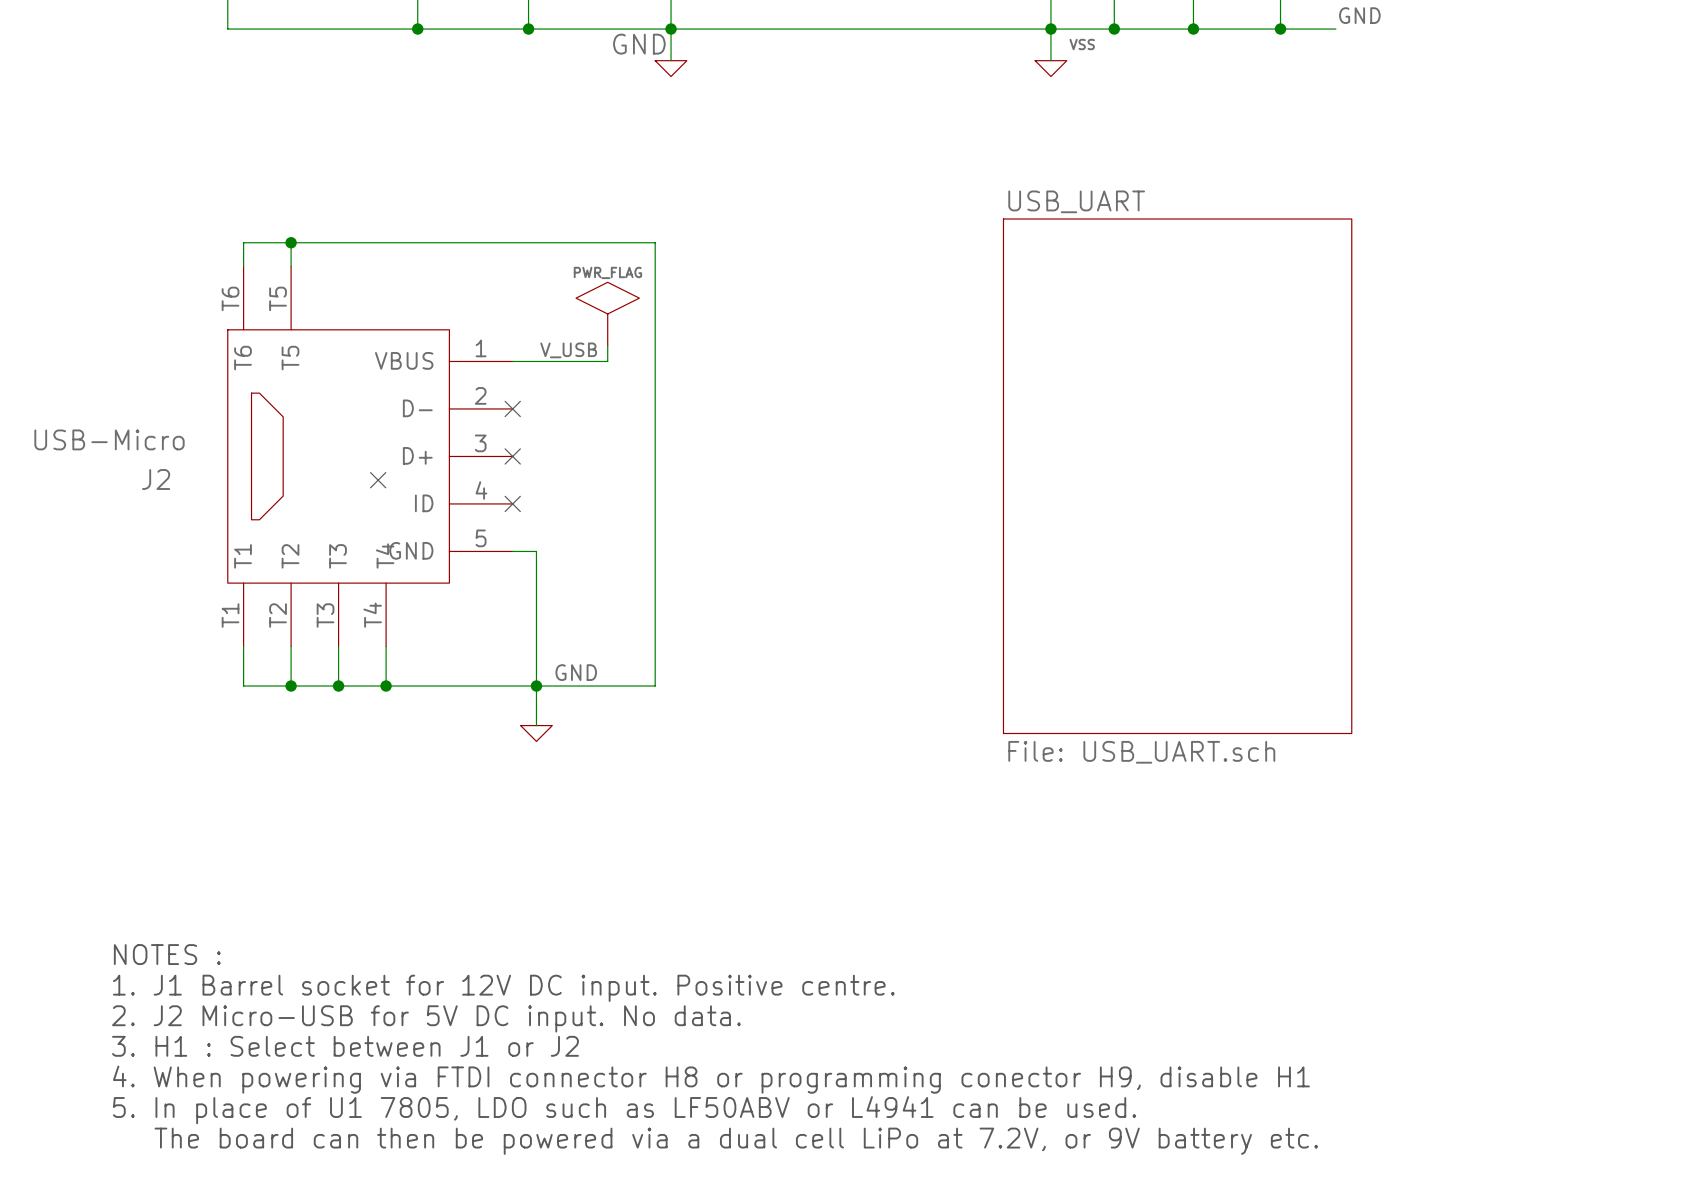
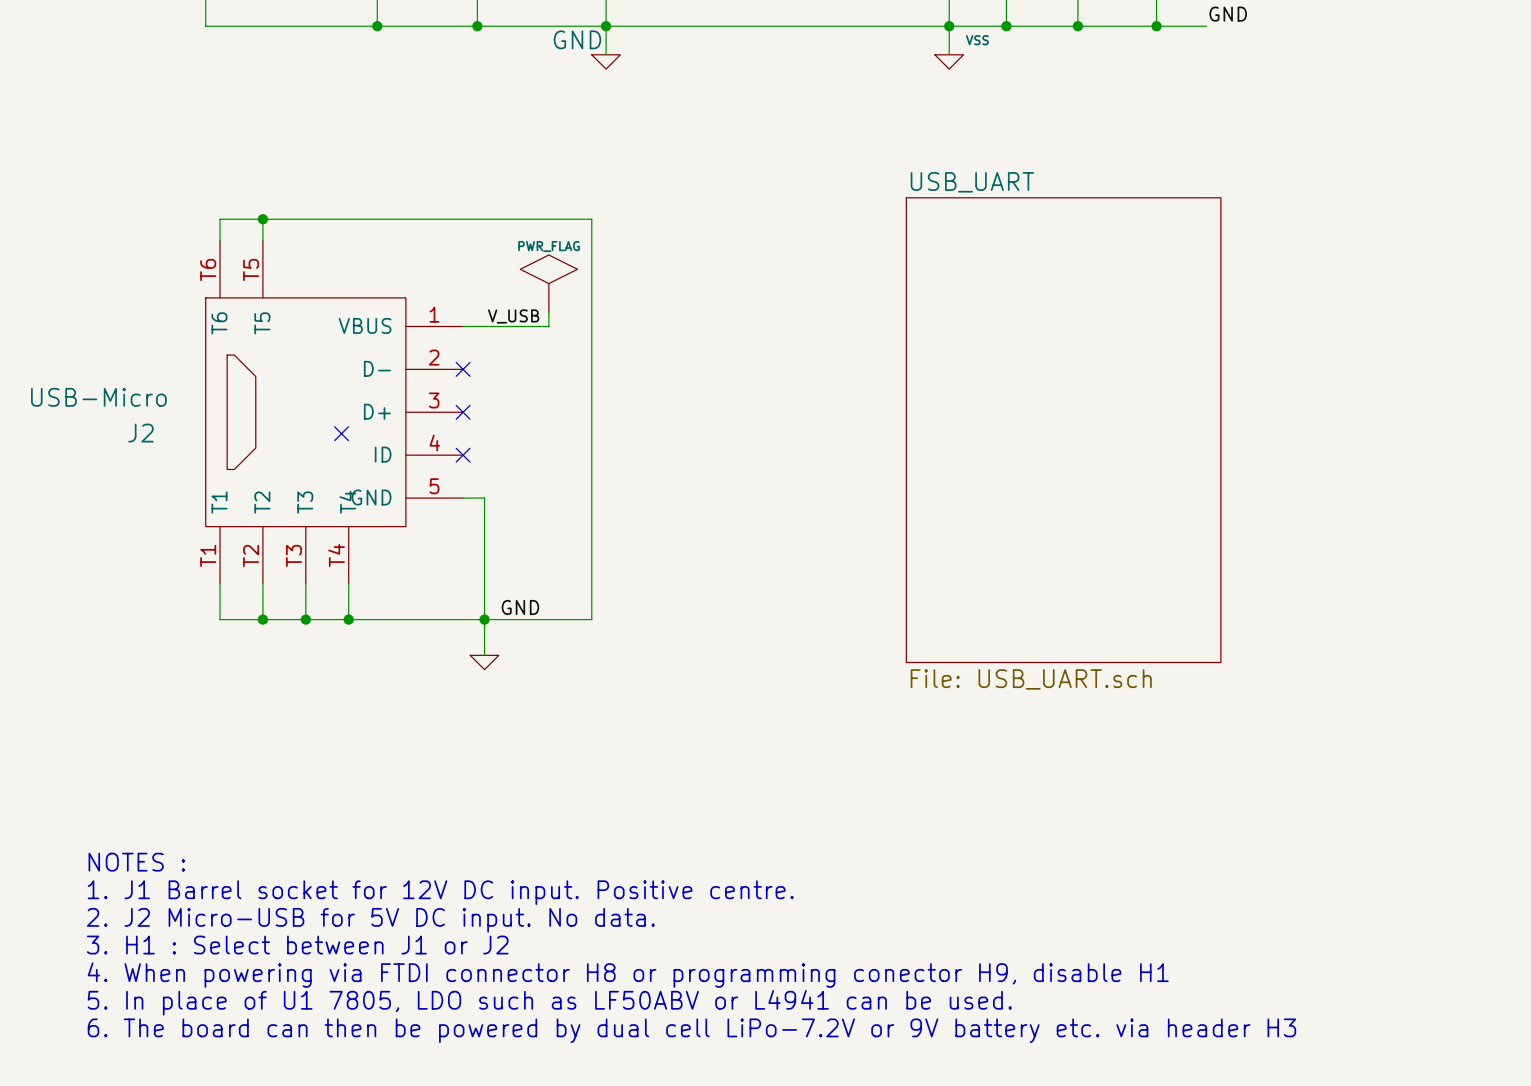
text position: NOTES : (167, 954) -> NOTES : (136, 862)
text position: 1. J1 Barrel socket for 12V DC input. Positive centre. (503, 988) -> 1. J1 Barrel socket for 12V DC input. Positive centre. (440, 892)
text position: 2. J2 Micro-USB for 5V DC input. No data. (426, 1018) -> 2. J2 Micro-USB for 5V DC input. No data. (370, 920)
text position: 3. H1 : Select between J1 or J2 (345, 1046) -> 3. H1 : Select between J1 or J2 (297, 945)
text position: 4. When powering via FTDI connector H8 or programming conector H9, disable H1 (711, 1079) -> 4. When powering via FTDI connector H8 or programming conector H9, disable H1 (628, 975)
text position: 5. In place of U1 7805, LDO such as LF50ABV or L4941 can be used. (624, 1110) -> 5. In place of U1 7805, LDO such as LF50ABV or L4941 can be used. (549, 1002)
text: The board can then be powered via a dual cell LiPo at 7.2V, or 9V battery etc. (736, 1141) -> 6. The board can then be powered by dual cell LiPo-7.2V or 9V battery etc. via header H3 (691, 1030)

